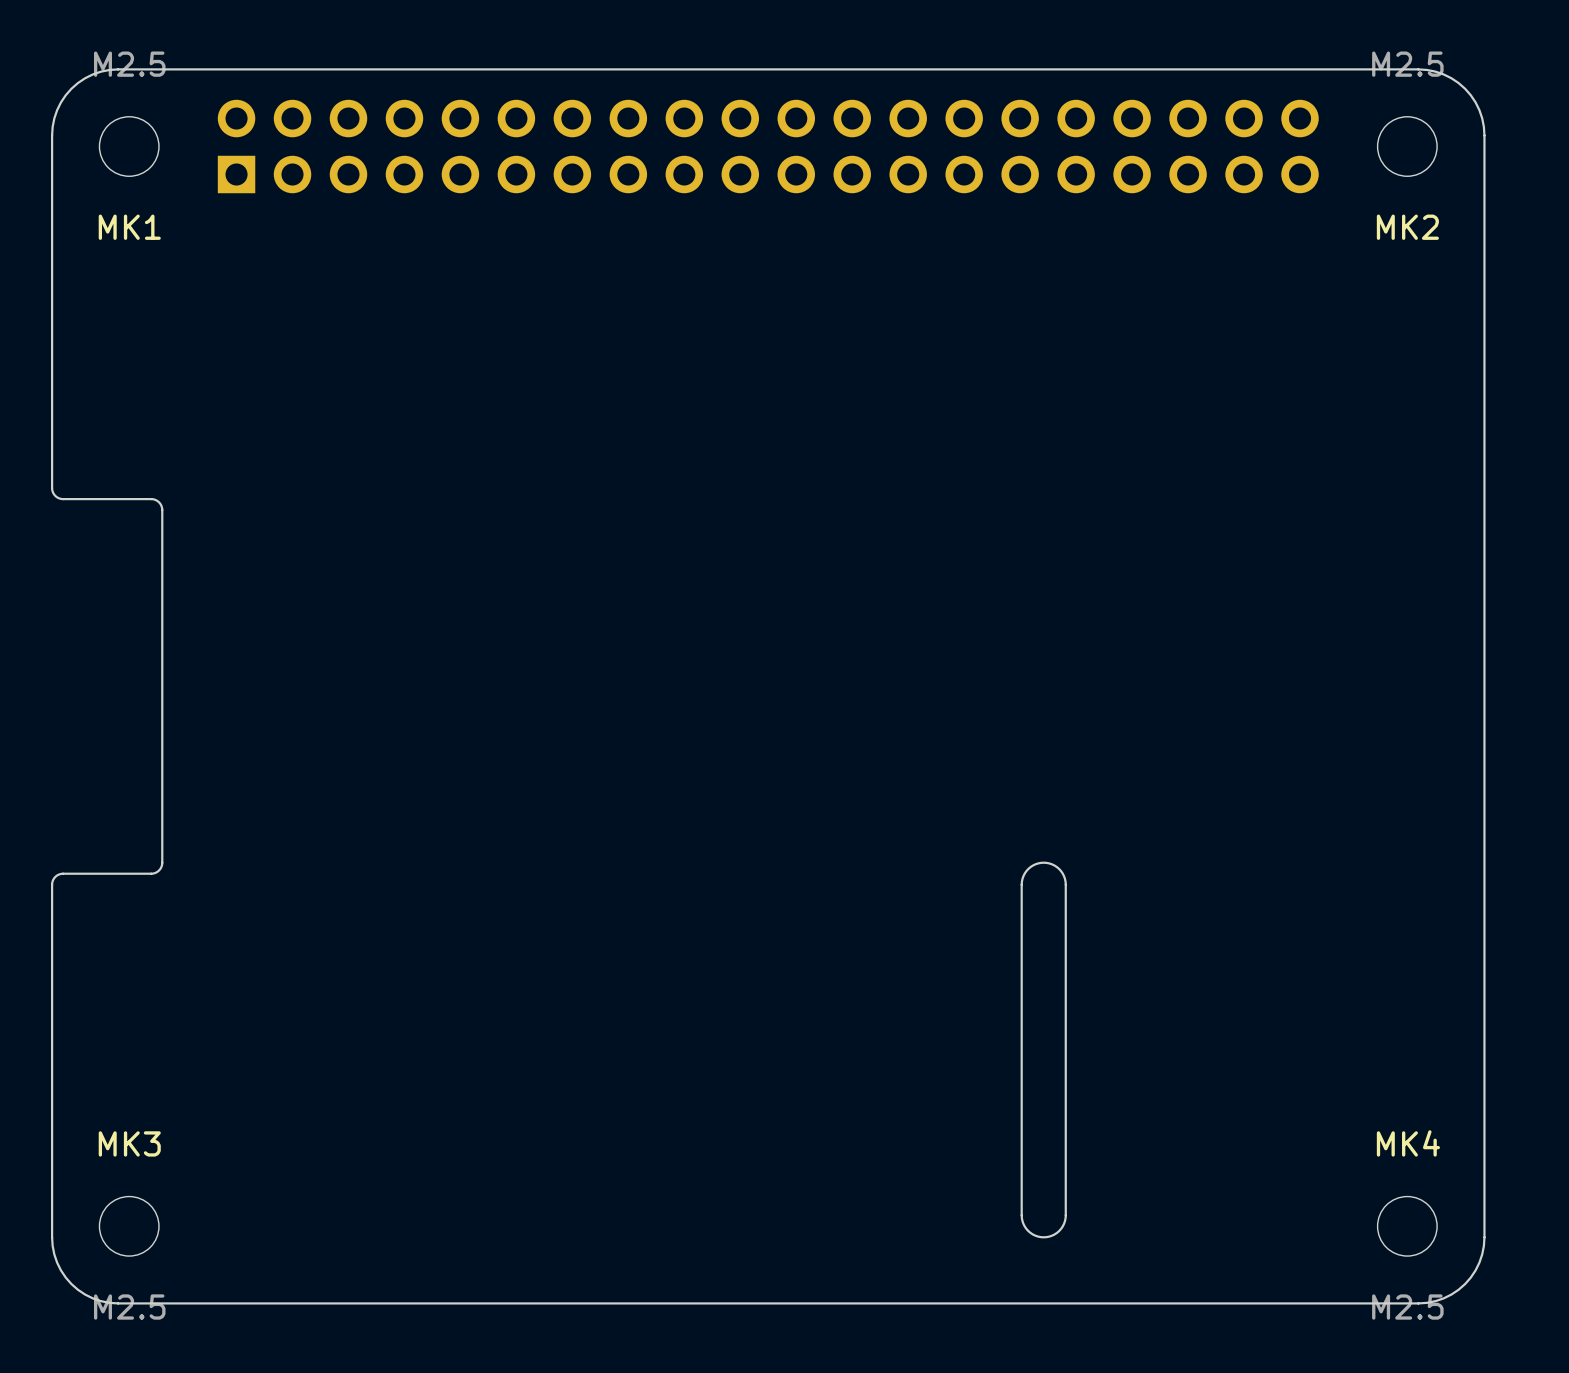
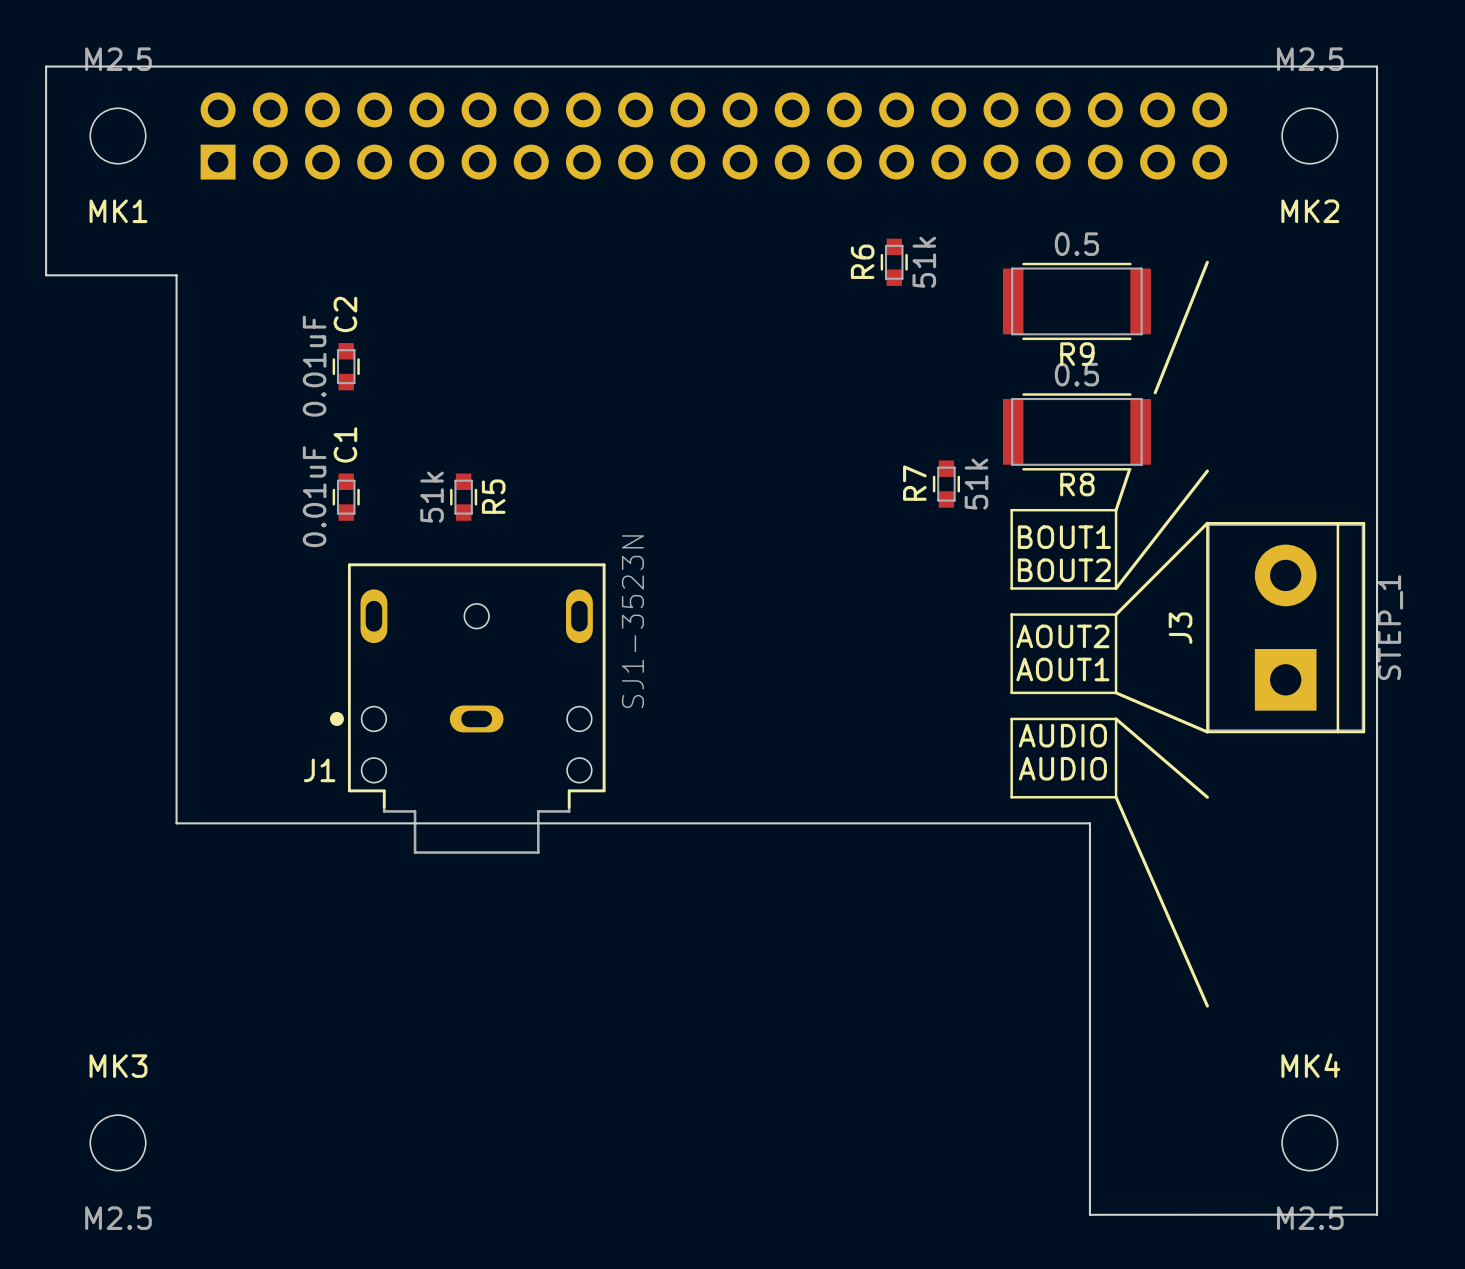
board edge: (52, 135) (57, 110) (71, 88) (92, 74) (118, 69) (1418, 69) (1443, 74) (1458, 83) (1470, 95) (1479, 110) (1484, 135) (1484, 1237) (1482, 1254) (1470, 1277) (1458, 1289) (1443, 1298) (1418, 1303) (118, 1303) (92, 1298) (77, 1289) (65, 1277) (57, 1262) (52, 1237) (52, 883) (55, 876) (61, 873) (152, 873) (159, 870) (161, 865) (162, 510) (159, 502) (152, 499) (63, 499) (53, 493) (52, 295) -> (46, 125) (46, 66) (1377, 66) (1377, 1214) (1089, 1214) (1089, 823) (176, 823) (176, 275) (46, 275)
R6: none -> 51k (894, 262)
line: none -> (1207, 262) (1155, 392)
R9: none -> 0.5 (1076, 301)
C2: none -> 0.01uF (346, 366)
R8: none -> 0.5 (1076, 431)
line: none -> (1129, 471) (1116, 510)
line: none -> (1207, 471) (1116, 588)
R7: none -> 51k (946, 484)
C1: none -> 0.01uF (346, 497)
R5: none -> 51k (463, 497)
line: none -> (1116, 510) (1116, 588)
line: none -> (1116, 510) (1011, 510) (1011, 588) (1116, 588)
line: none -> (1207, 523) (1116, 614)
text: none -> BOUT1 (1064, 537)
text: none -> BOUT2 (1064, 570)
line: none -> (1116, 614) (1116, 692)
line: none -> (1116, 614) (1011, 614) (1011, 692) (1116, 692)
J3: none -> STEP_1 (1285, 627)
text: none -> AOUT2 (1062, 636)
text: none -> AOUT1 (1062, 669)
line: none -> (1116, 692) (1207, 732)
J1: none -> SJ1-3523N (467, 708)
line: none -> (1116, 718) (1207, 797)
line: none -> (1116, 718) (1011, 718) (1011, 797) (1116, 797)
line: none -> (1116, 718) (1116, 797)
text: none -> AUDIO (1062, 735)
text: none -> AUDIO (1062, 768)
line: none -> (1116, 797) (1207, 1006)
board edge: (1021, 884) (1021, 1218) (1024, 1226) (1030, 1232) (1038, 1236) (1046, 1237) (1054, 1234) (1061, 1228) (1065, 1215) (1065, 881) (1062, 873) (1057, 867) (1049, 863) (1040, 862) (1032, 865) (1026, 871) (1021, 884) -> none

